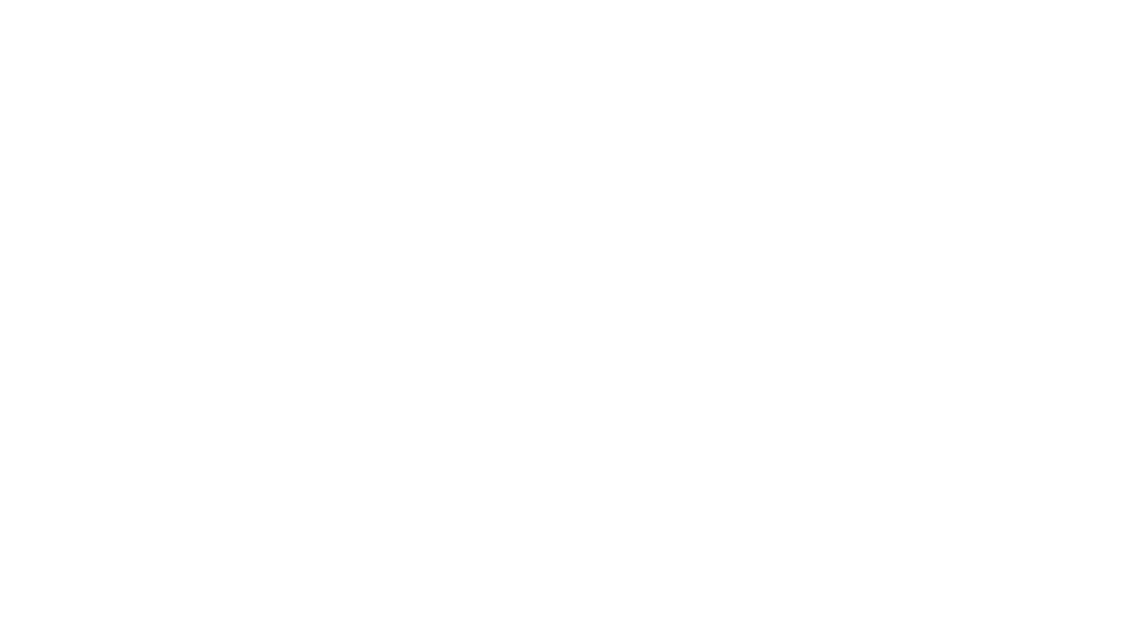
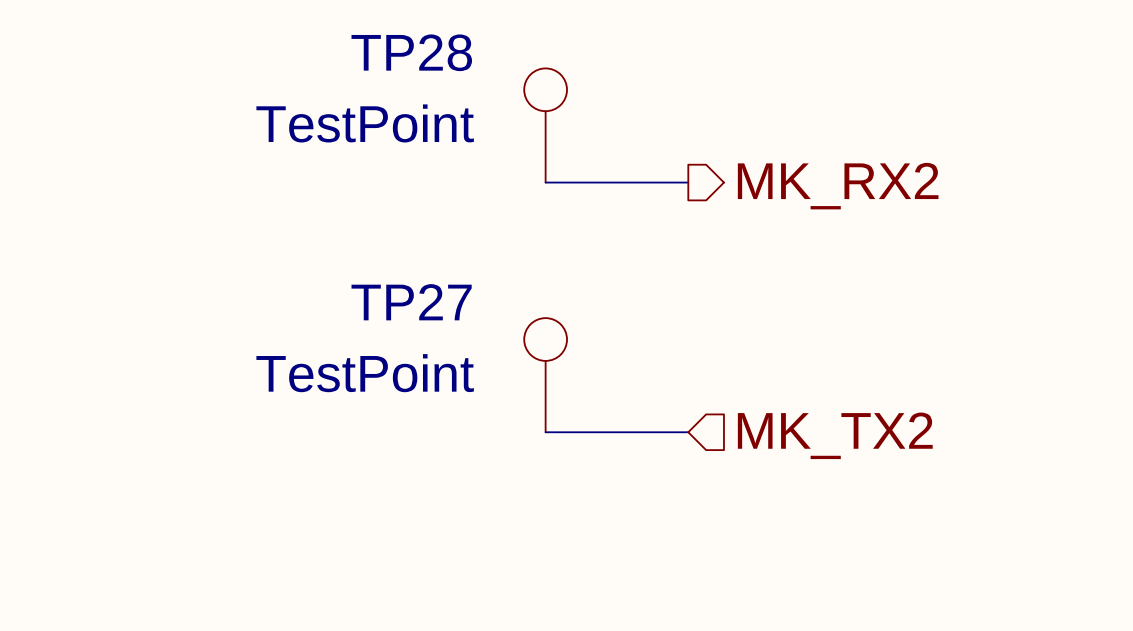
TP28: none -> TestPoint (545, 125)
wire: none -> (545, 182) (688, 182)
hierarchical label: none -> MK_RX2 (838, 186)
TP27: none -> TestPoint (545, 375)
wire: none -> (545, 432) (688, 432)
hierarchical label: none -> MK_TX2 (835, 435)

